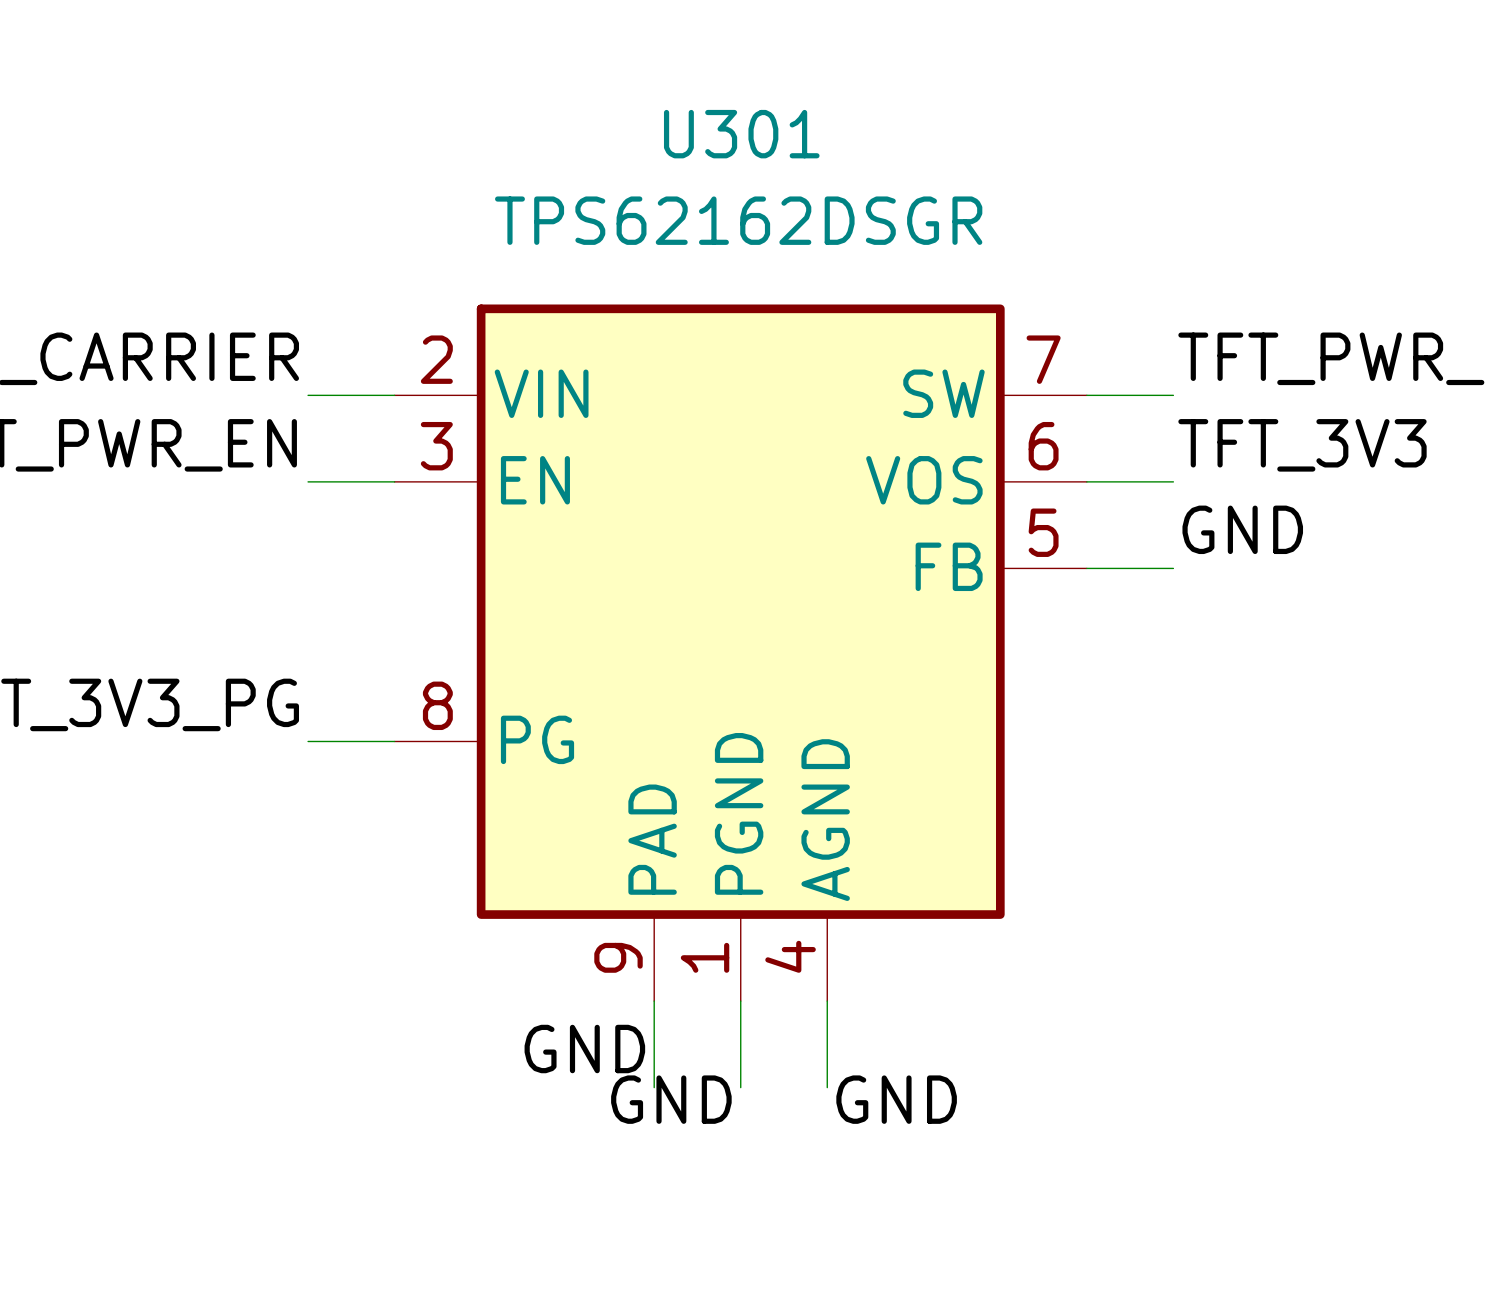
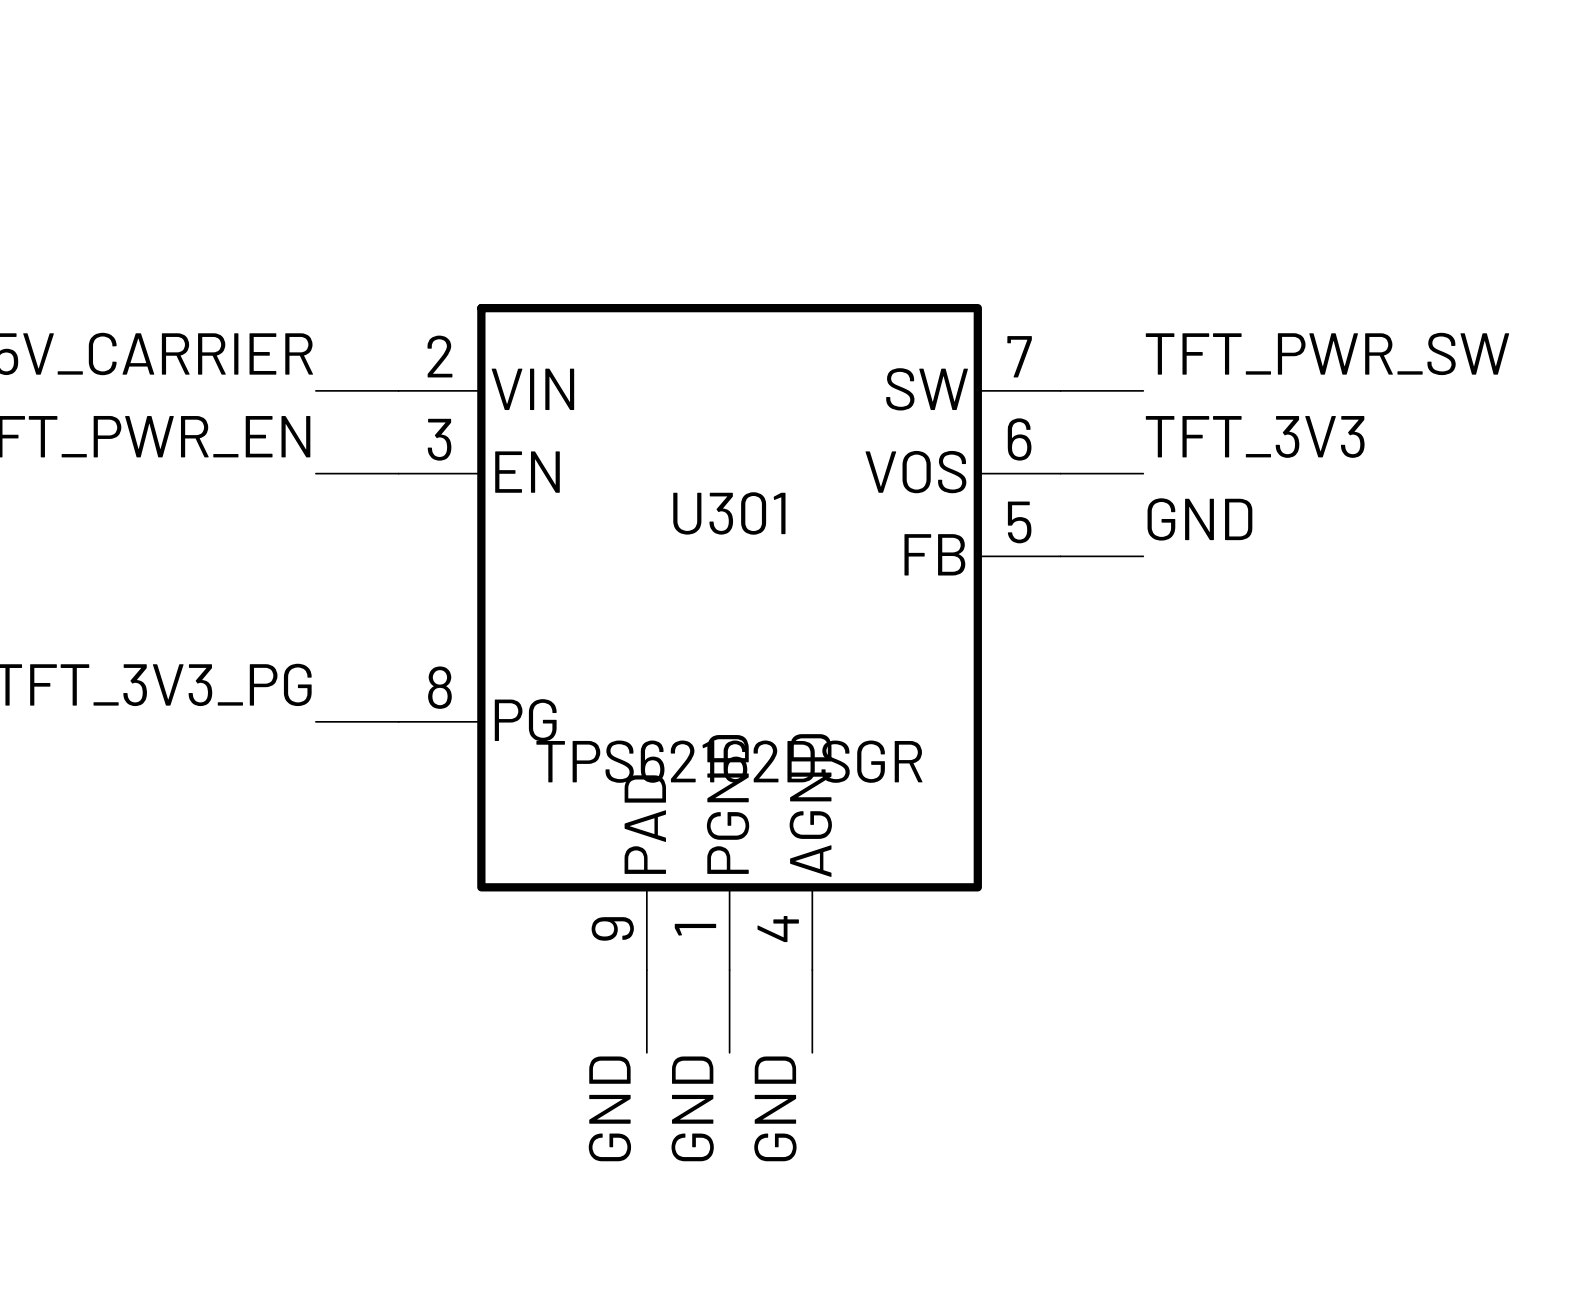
U301 name position: U301 (741, 134) -> U301 (729, 513)
U301 value position: TPS62162DSGR (738, 220) -> TPS62162DSGR (729, 761)
label rotation: 0° (584, 1049) -> 90° counterclockwise (609, 1108)
label rotation: 0° (671, 1099) -> 90° counterclockwise (692, 1108)
label rotation: 0° (896, 1099) -> 90° counterclockwise (775, 1108)

